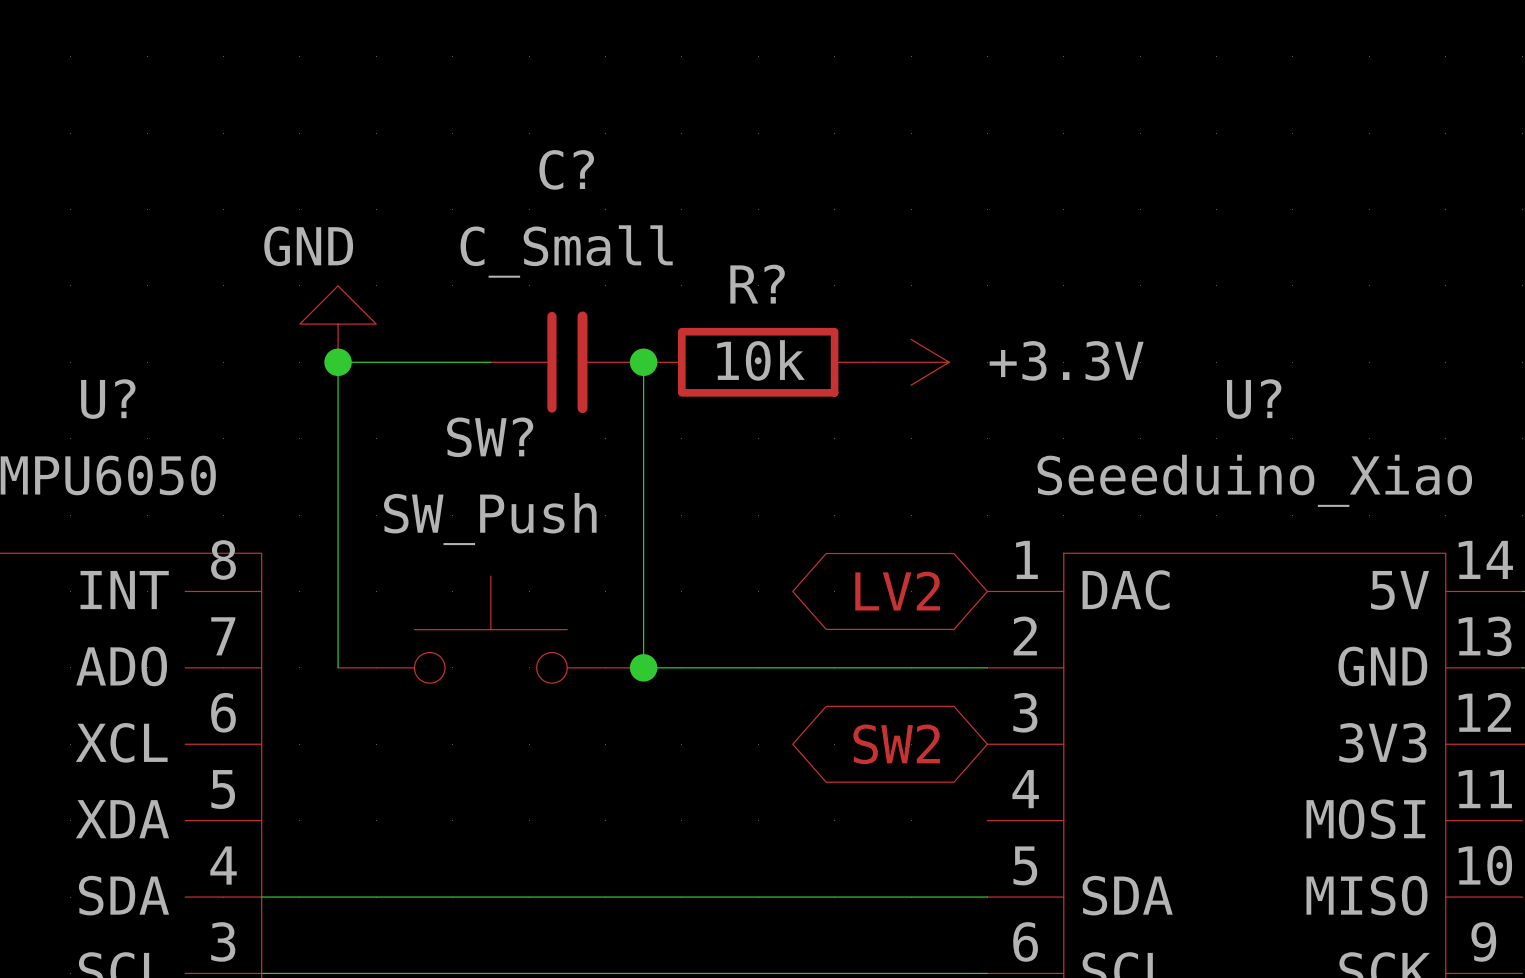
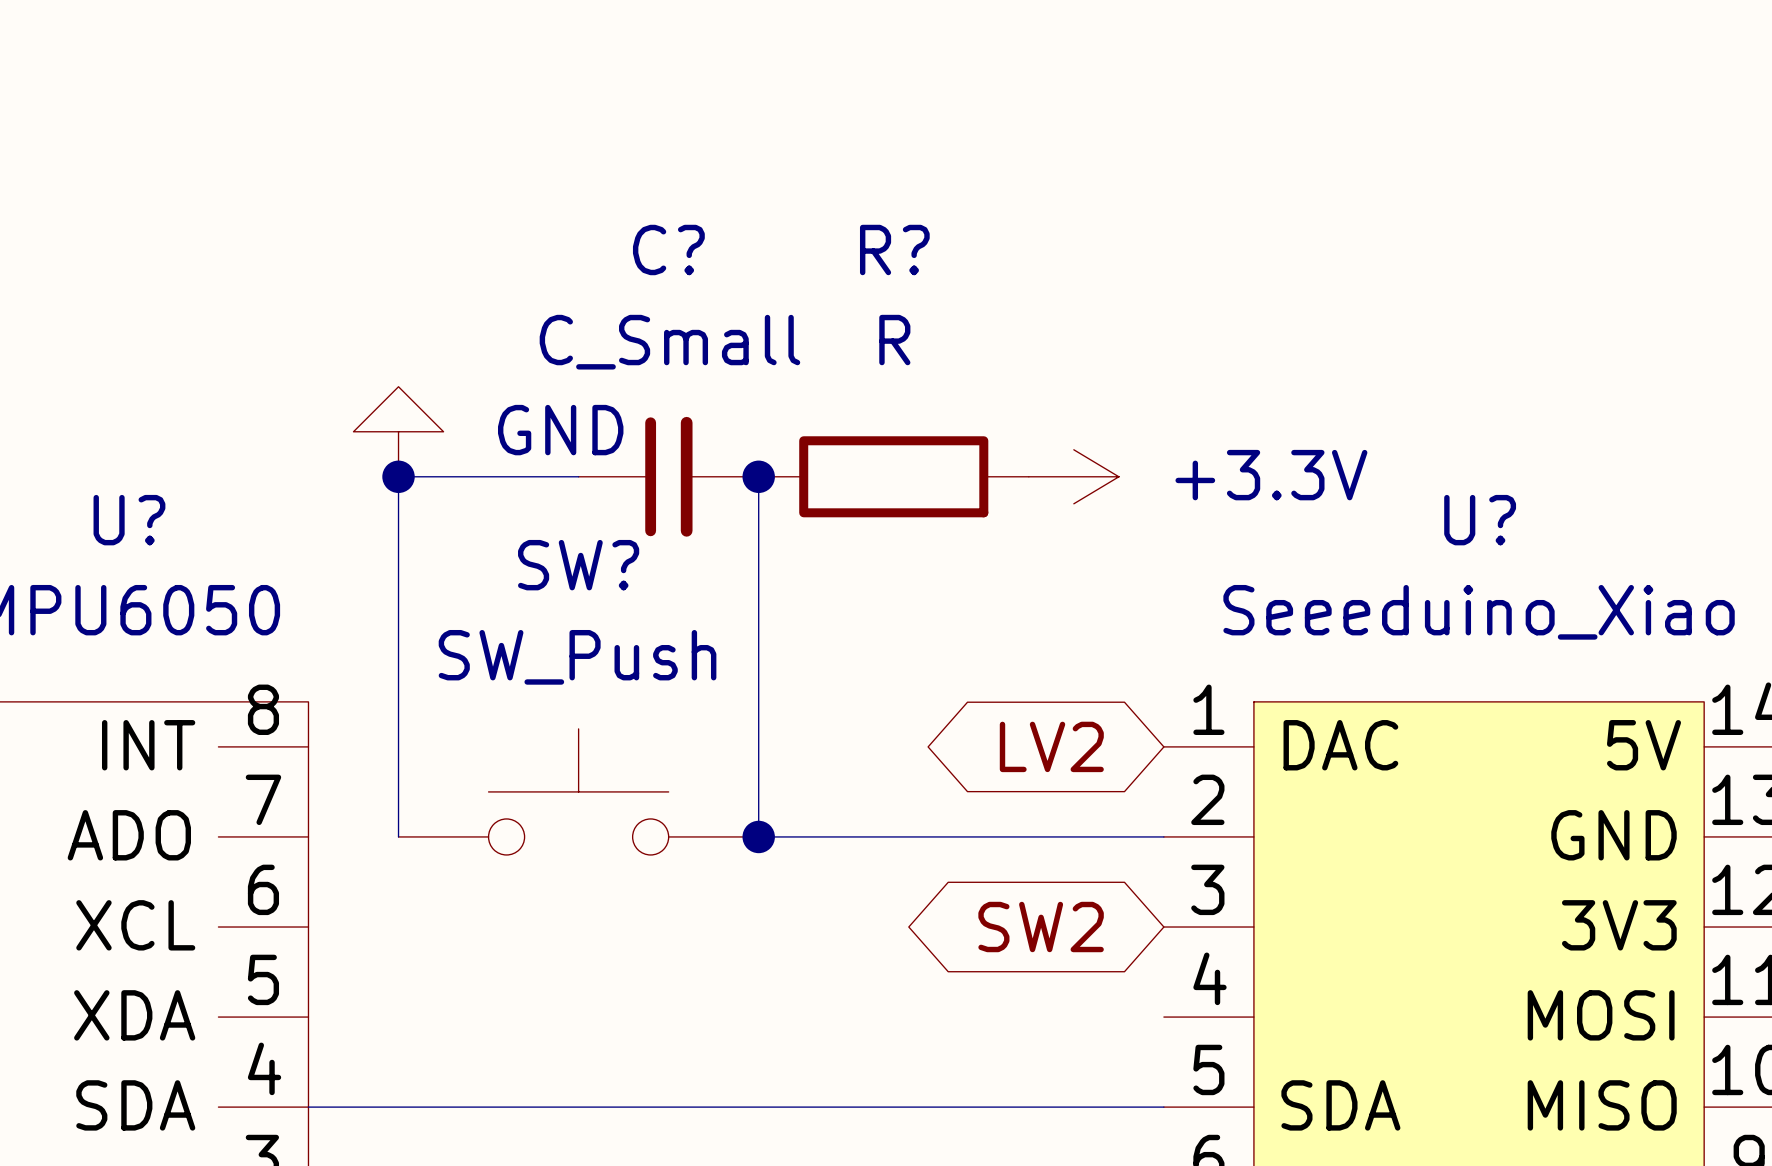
power symbol text position: GND (308, 246) -> GND (560, 430)
R? name position: R? (757, 284) -> R? (894, 249)
R? value: 10k (760, 360) -> R (894, 340)

